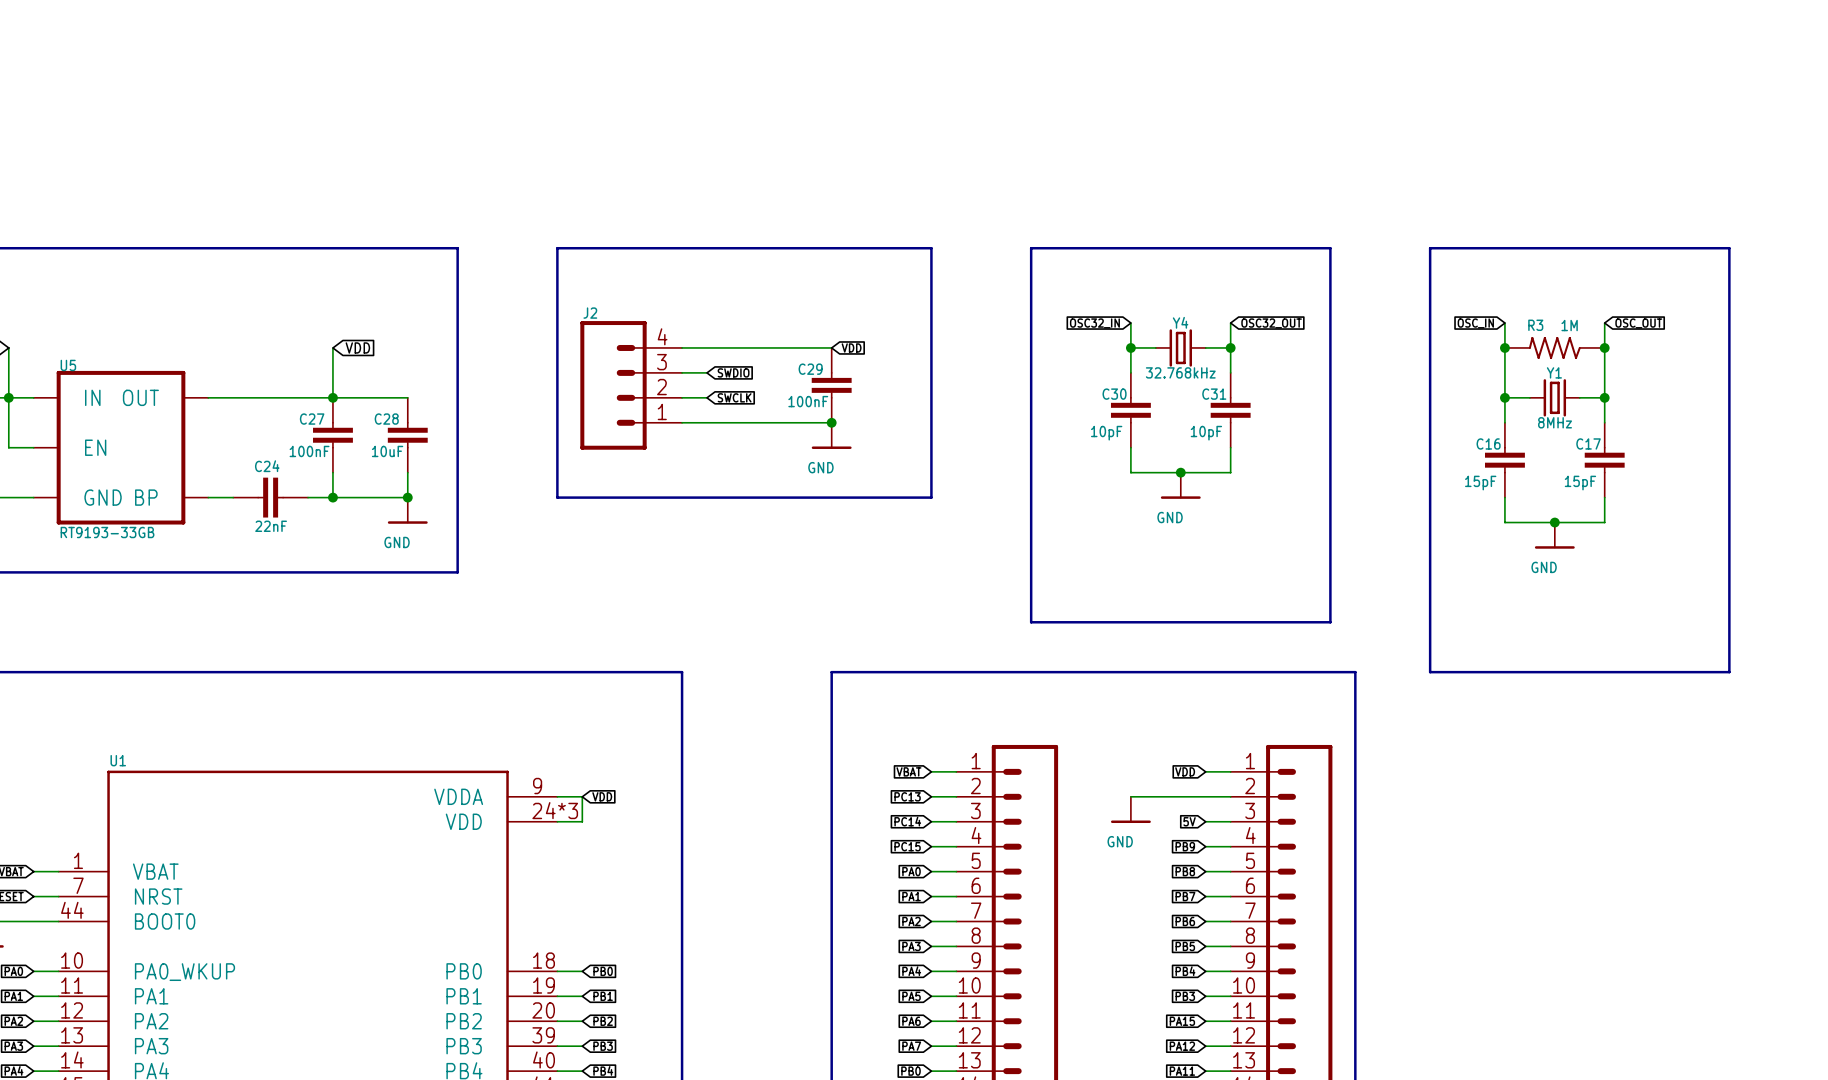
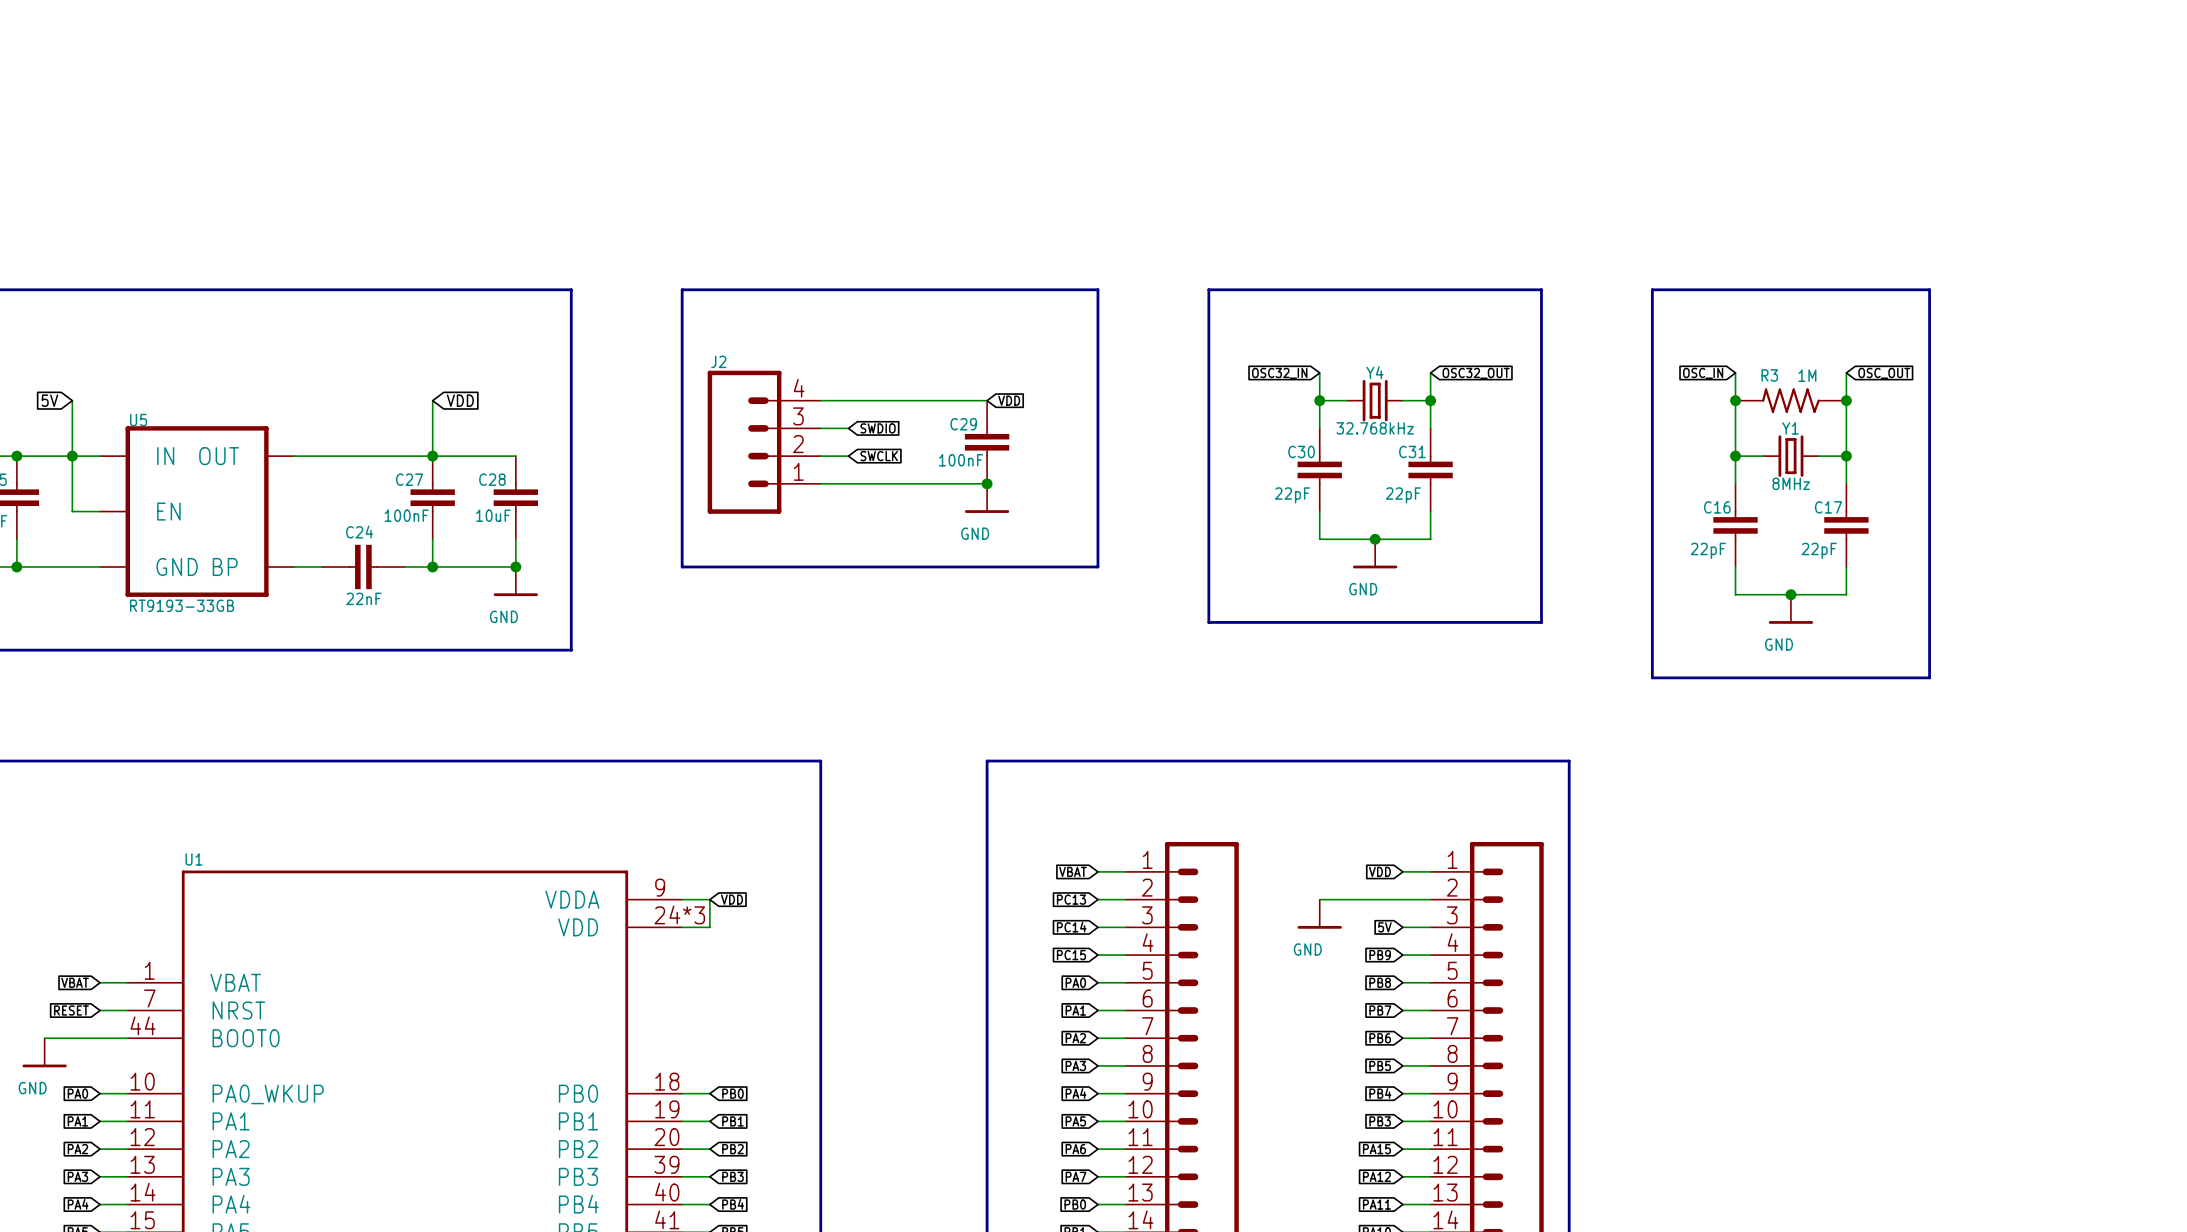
line: (1679, 248) (1729, 248) (1729, 672) (1430, 672) (1430, 597) -> (1929, 289) (1929, 677) (1652, 677)
C30 value: 10pF (1106, 433) -> 22pF (1292, 495)
C31 value: 10pF (1206, 433) -> 22pF (1403, 495)
C16 value: 15pF (1480, 483) -> 22pF (1708, 550)
C17 value: 15pF (1580, 483) -> 22pF (1819, 550)
line: (1031, 547) (1031, 622) (1330, 622) (1330, 547) -> (1208, 622) (1541, 622)

